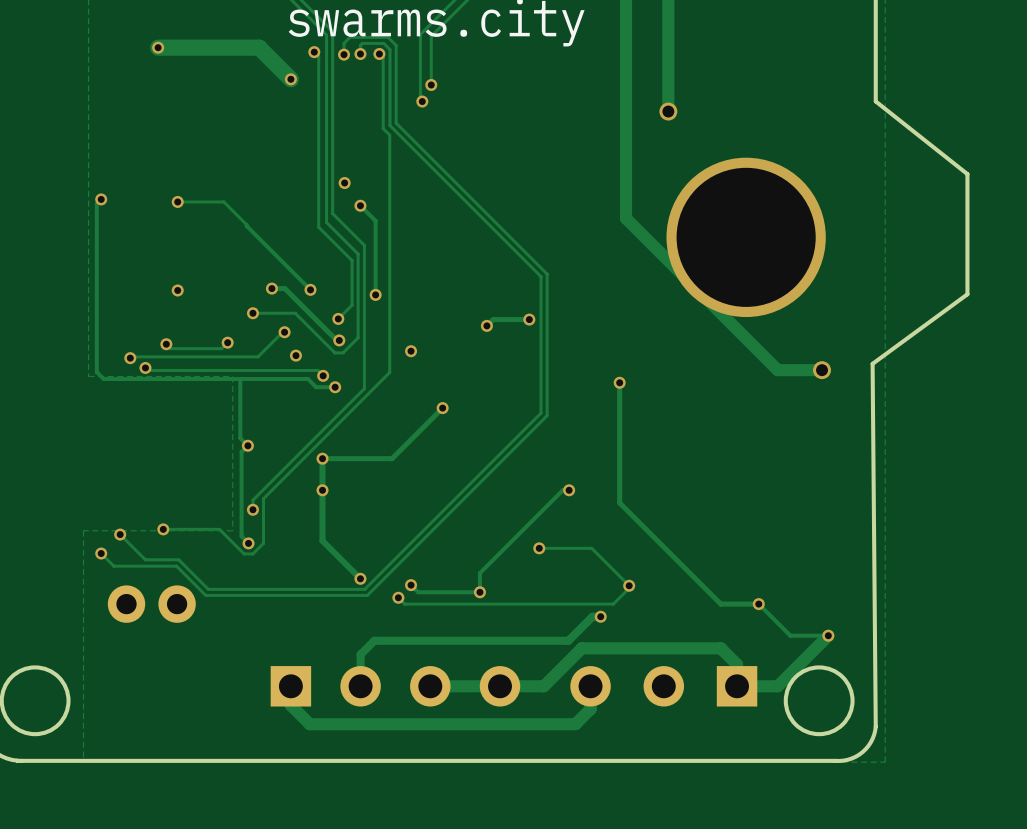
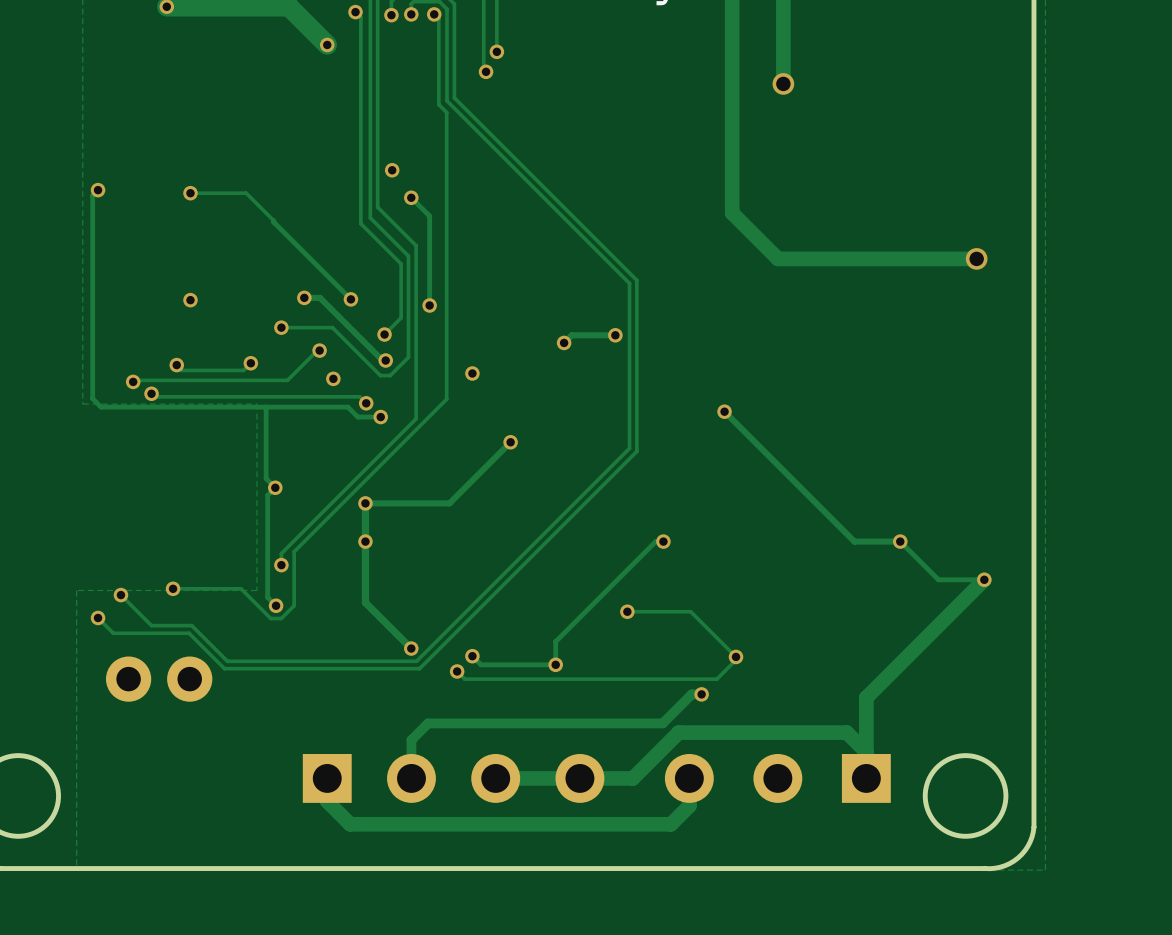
board edge: (875, 101) (967, 174) (967, 294) (872, 363) (875, 726) -> (1033, 71) (1033, 827)
via: (746, 237) -> none
track: (663, 256) (777, 370) (822, 370) -> (778, 258) (976, 258)
via position: (822, 370) -> (976, 258)
track: (619, 382) (619, 502) (720, 604) (758, 604) (790, 635) (828, 635) (777, 686) (737, 686) -> (724, 411) (854, 541) (900, 541) (938, 579) (984, 579) (866, 697) (866, 752)
via: none -> (900, 541)
via: none -> (984, 579)
via: (758, 604) -> none
via: (828, 635) -> none

